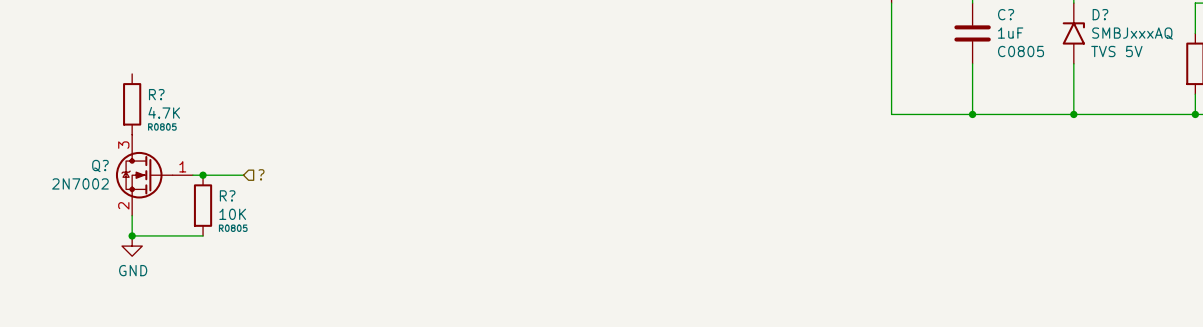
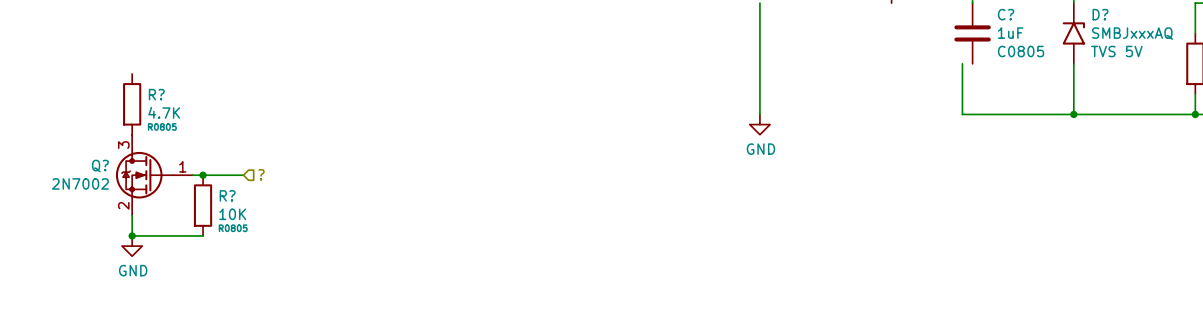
wire: none -> (759, 3) (759, 114)
wire: (891, 3) (891, 114) (962, 114) -> (962, 63) (962, 114)
wire: (972, 63) (972, 114) -> none
junction: (972, 114) -> none
power symbol: none -> GND (759, 124)

